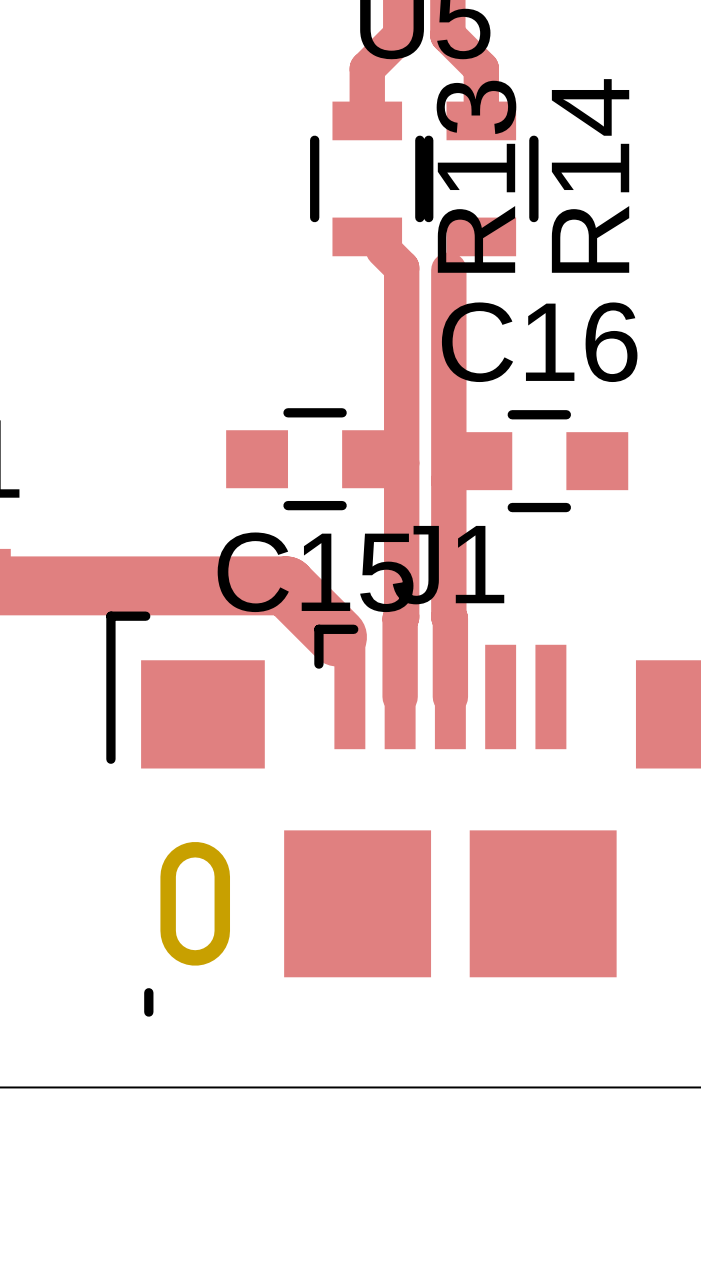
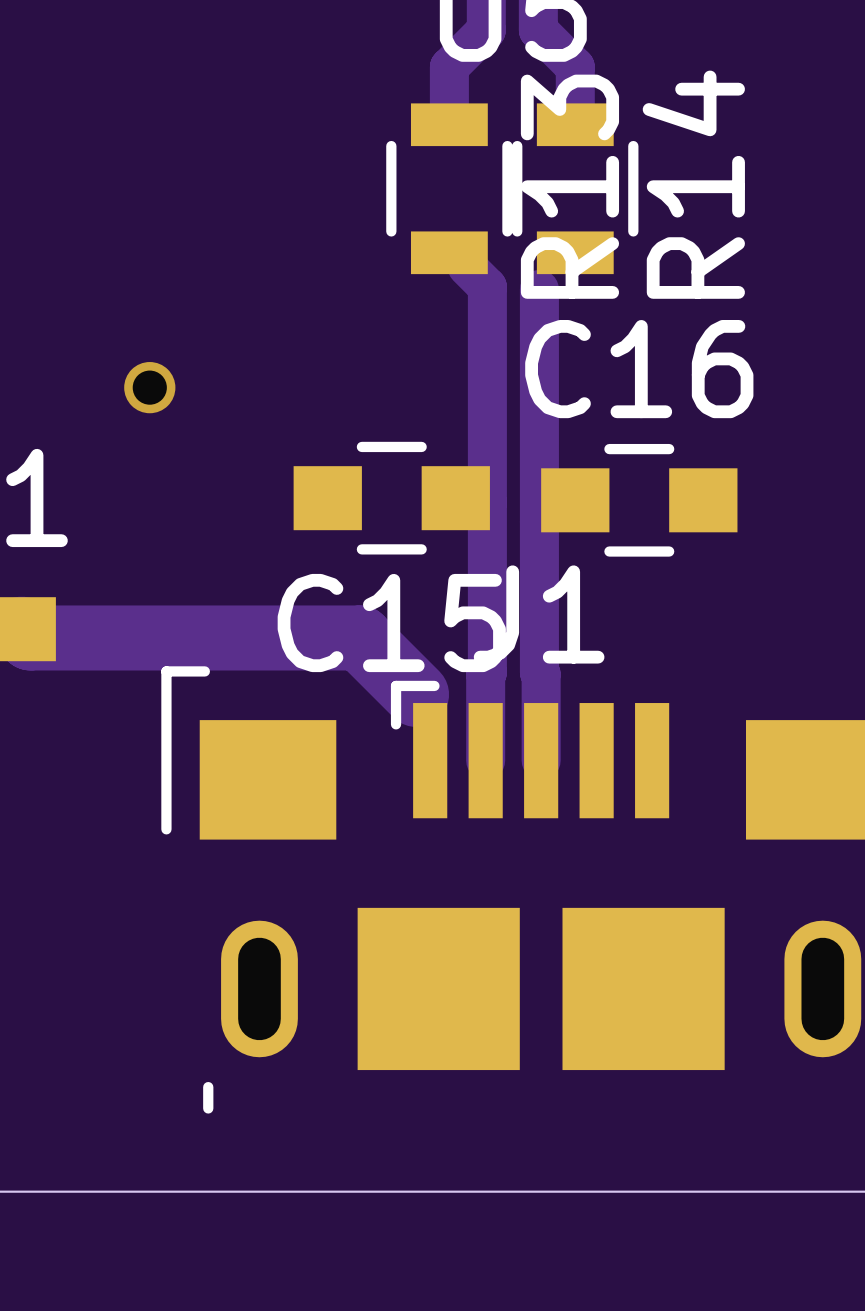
via: none -> (149, 387)

